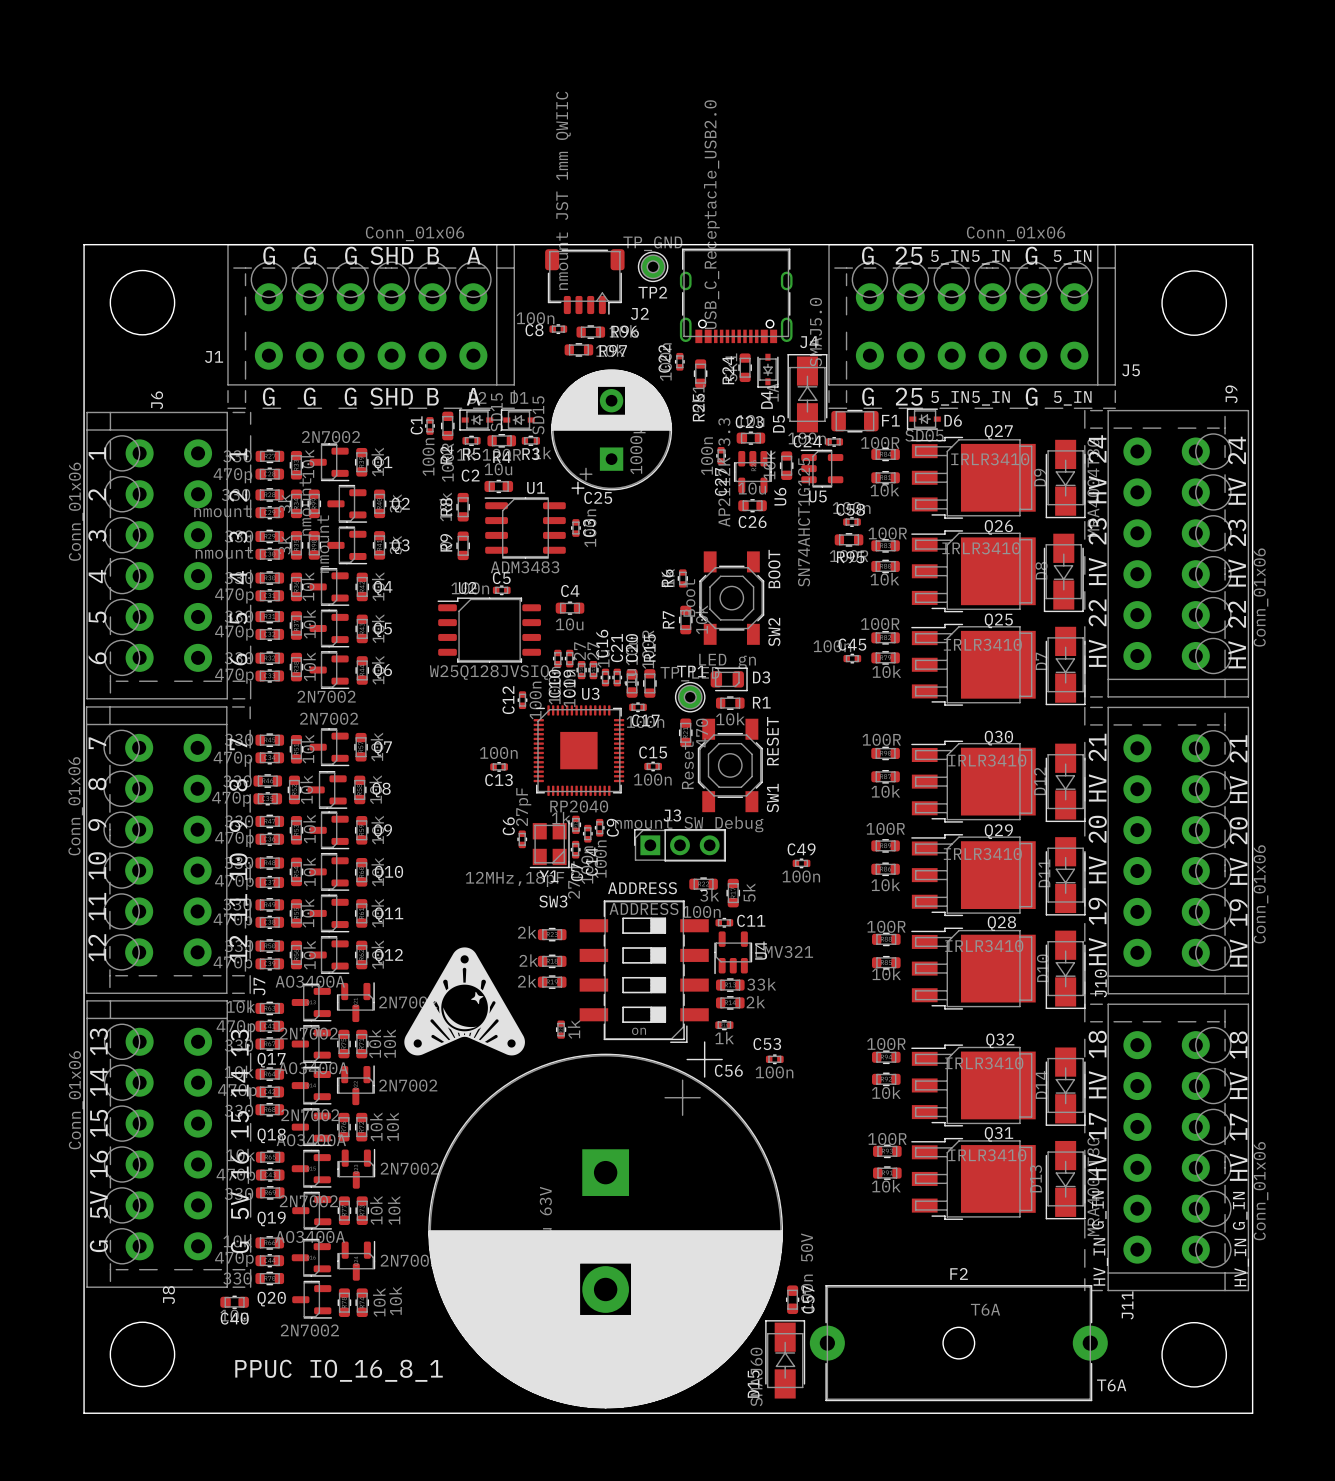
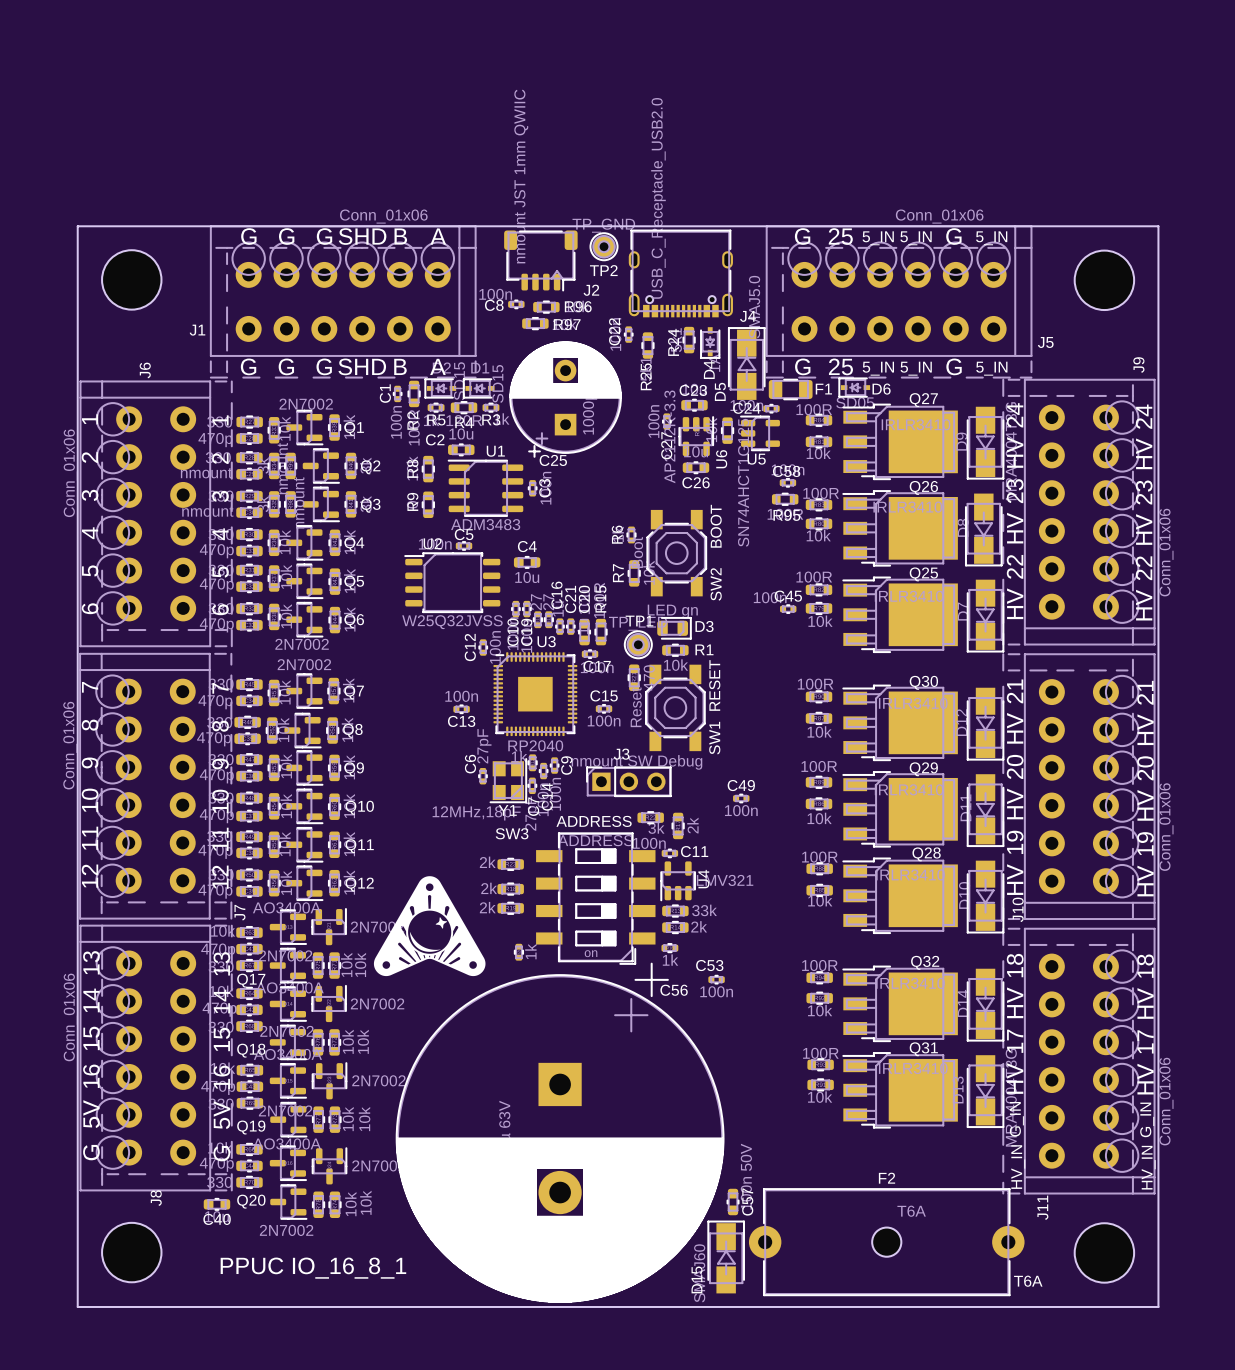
U2 value: W25Q128JVSIQ (489, 672) -> W25Q32JVSS (452, 622)
part value: 5k (749, 892) -> 2k (692, 825)

